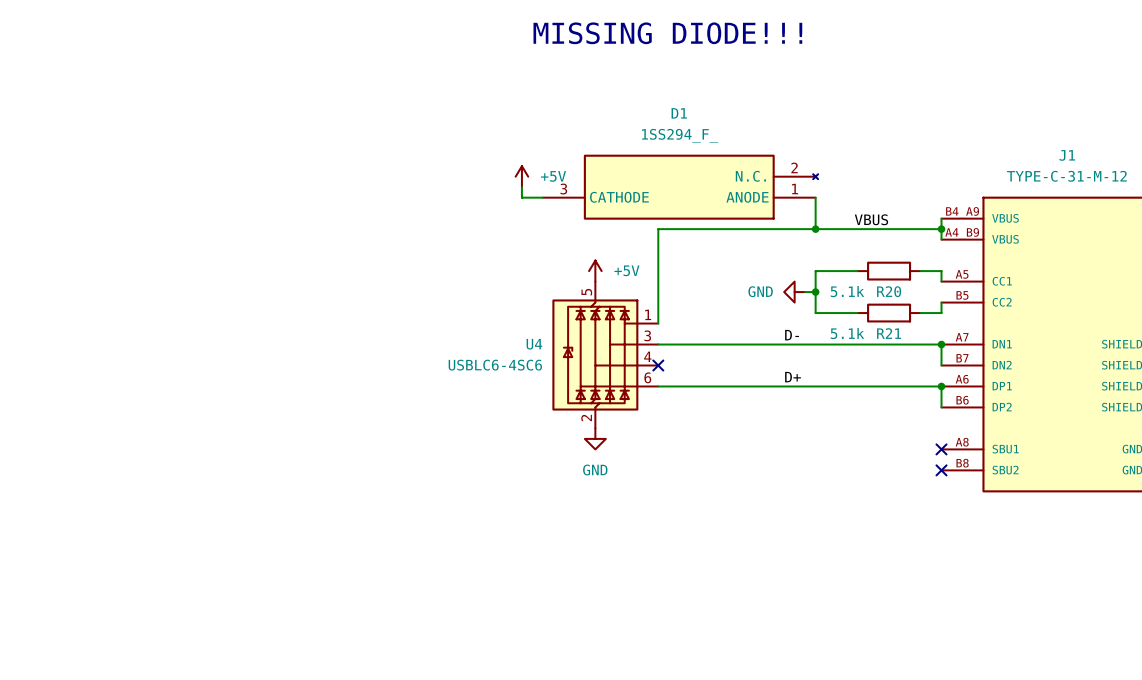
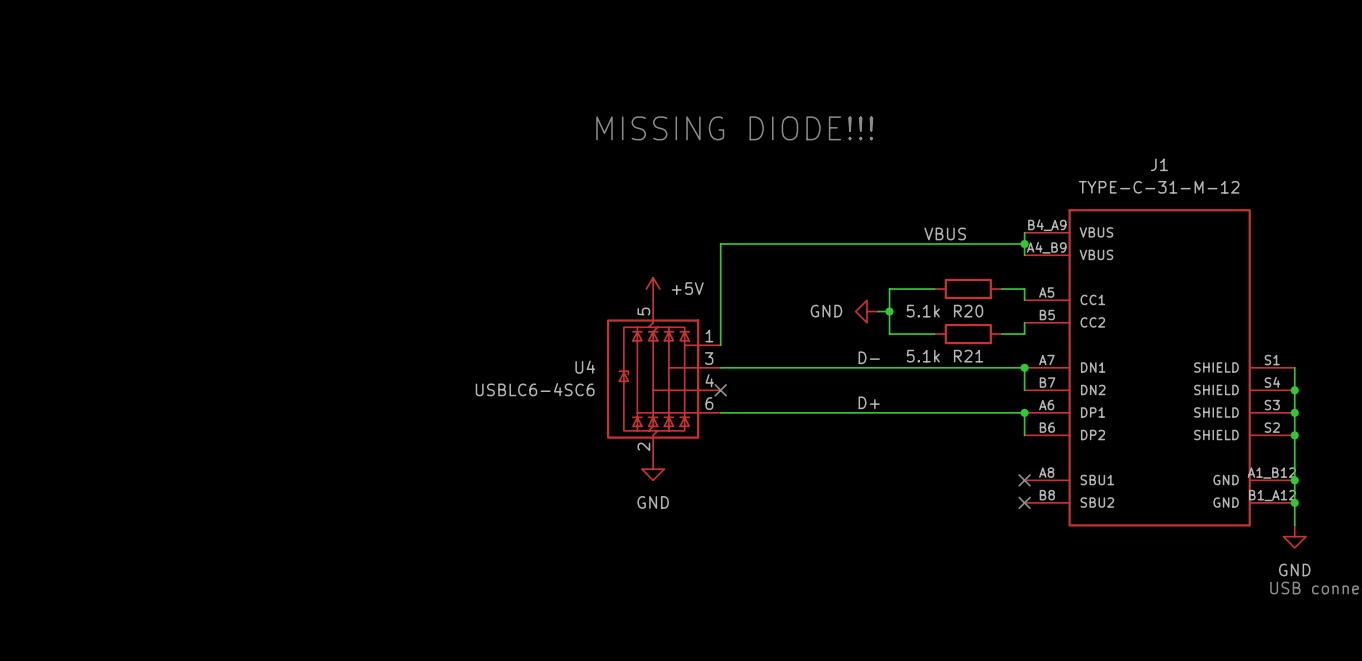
text position: MISSING DIODE!!! (667, 33) -> MISSING DIODE!!! (734, 128)
power symbol: +5V (521, 176) -> none
wire: (521, 187) (521, 197) (542, 197) -> none
D1: 1SS294_F_ (680, 187) -> none
wire: (815, 197) (815, 229) -> none
junction: (815, 229) -> none

